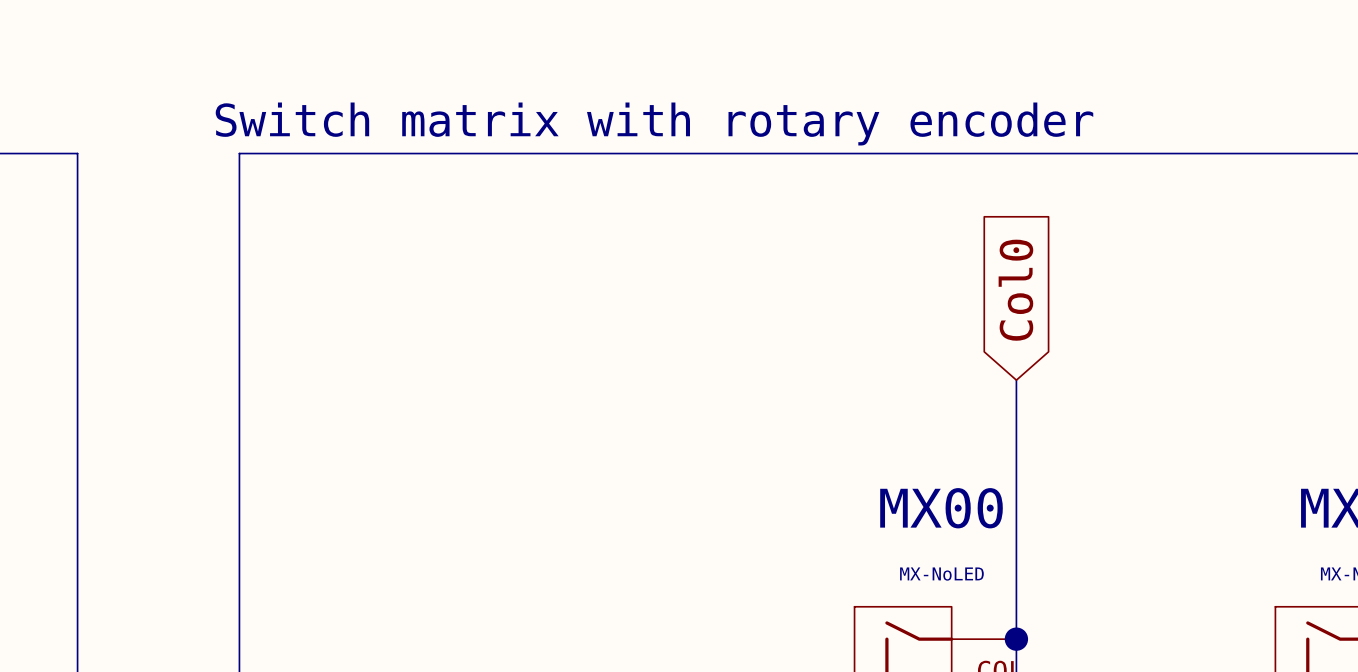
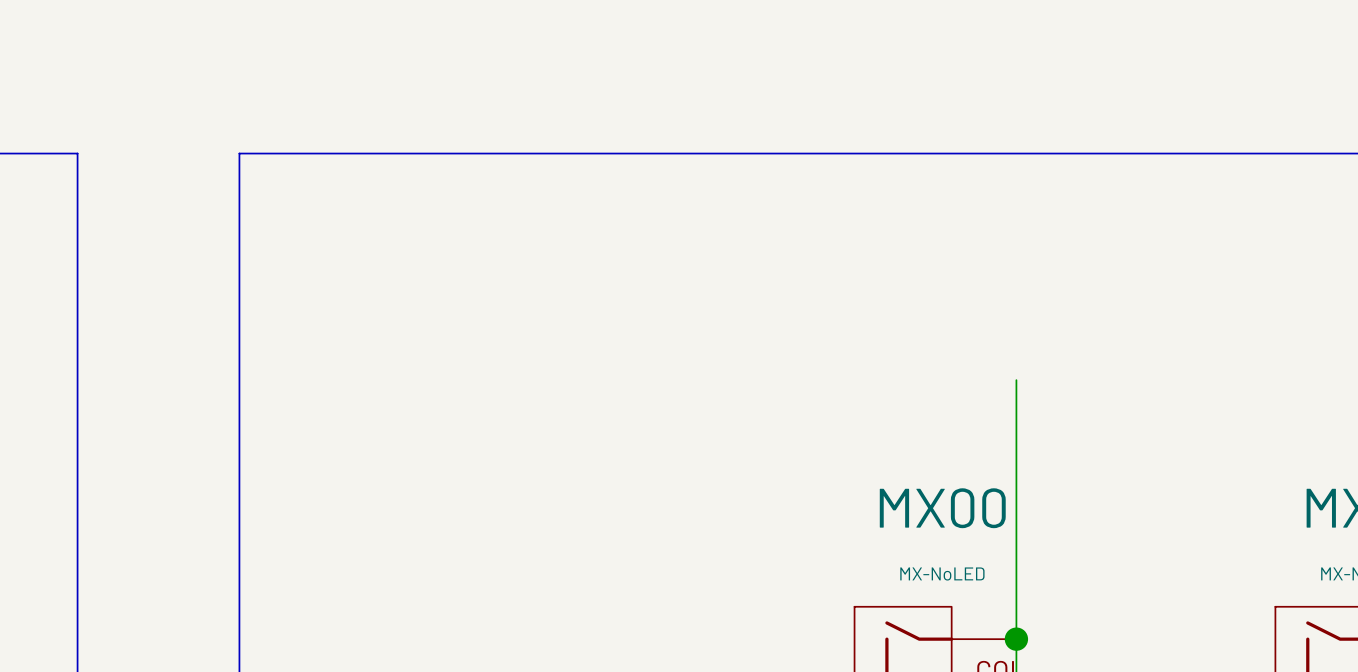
text: Switch matrix with rotary encoder (654, 124) -> none
global label: Col0 (1015, 290) -> none

